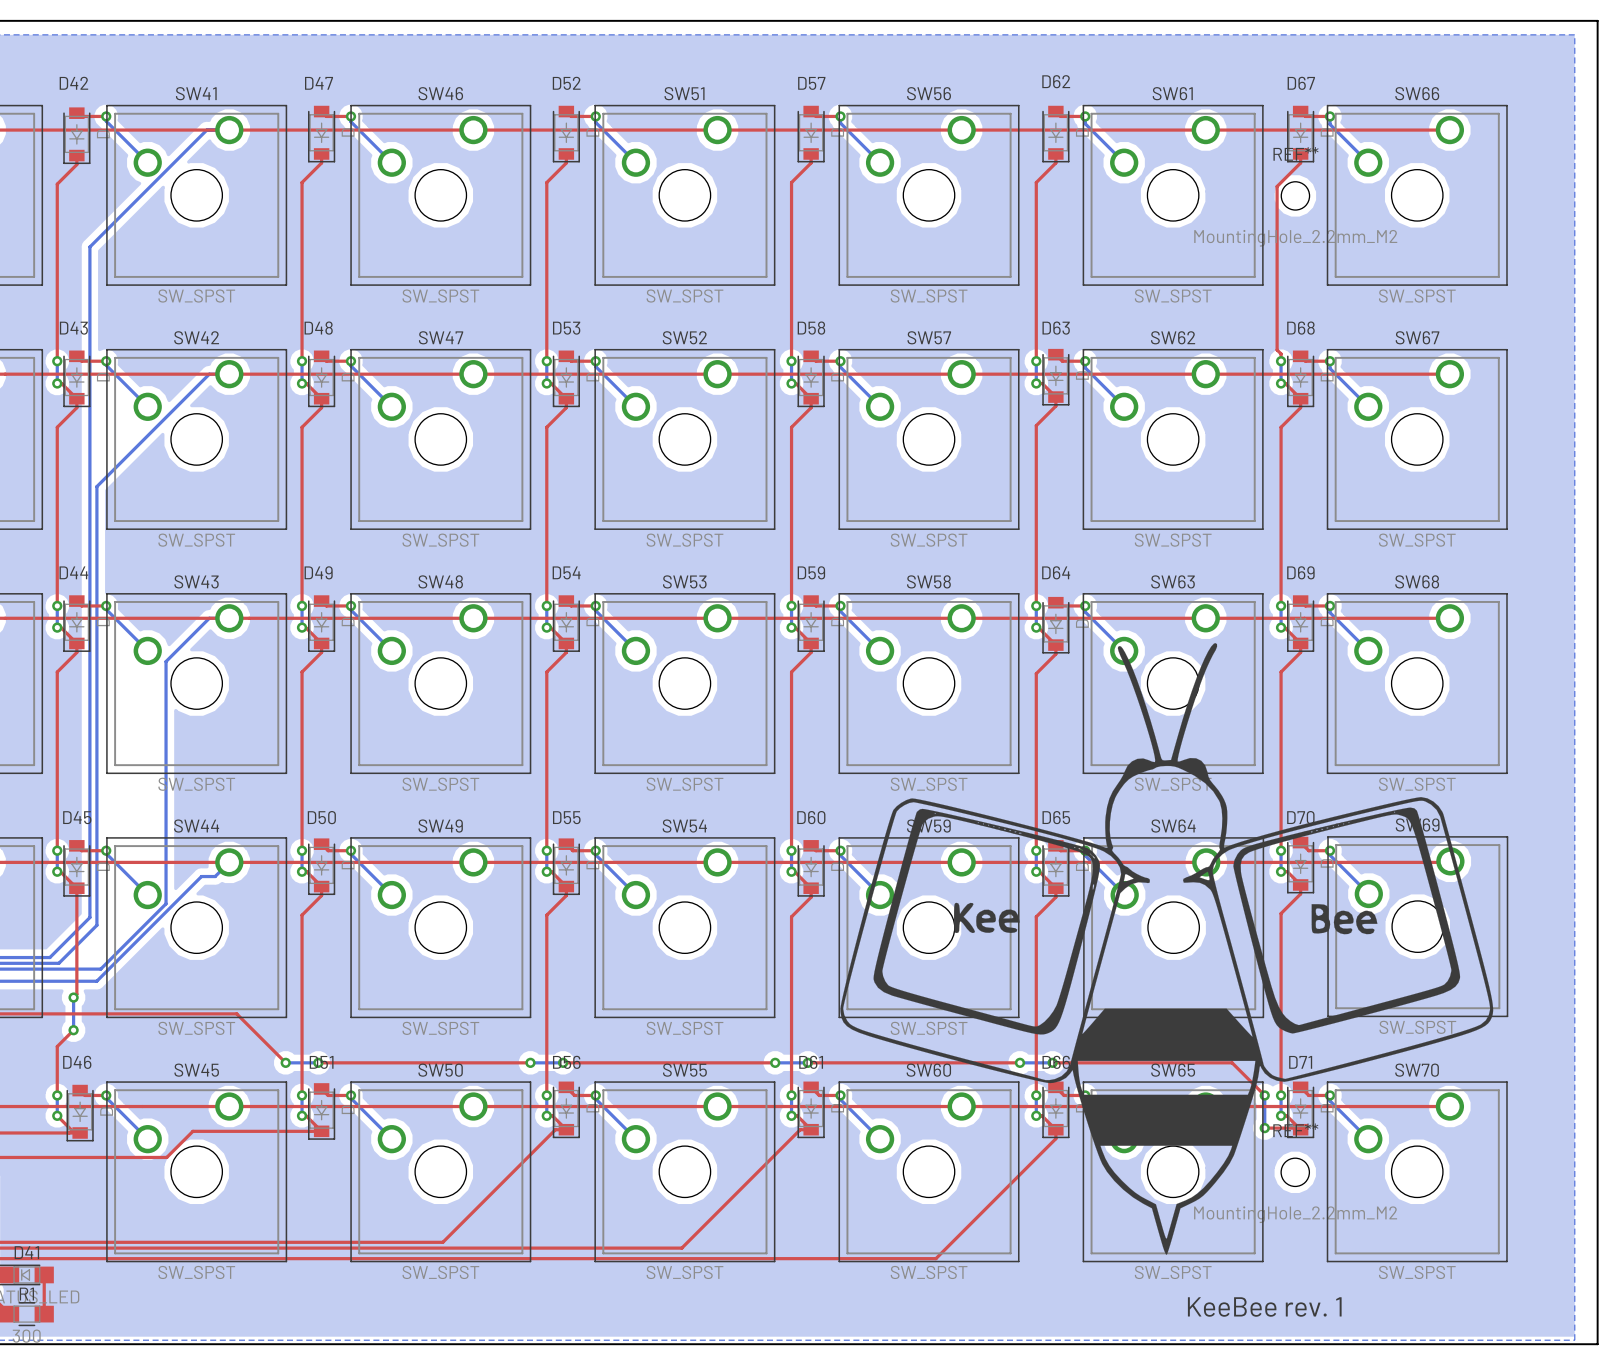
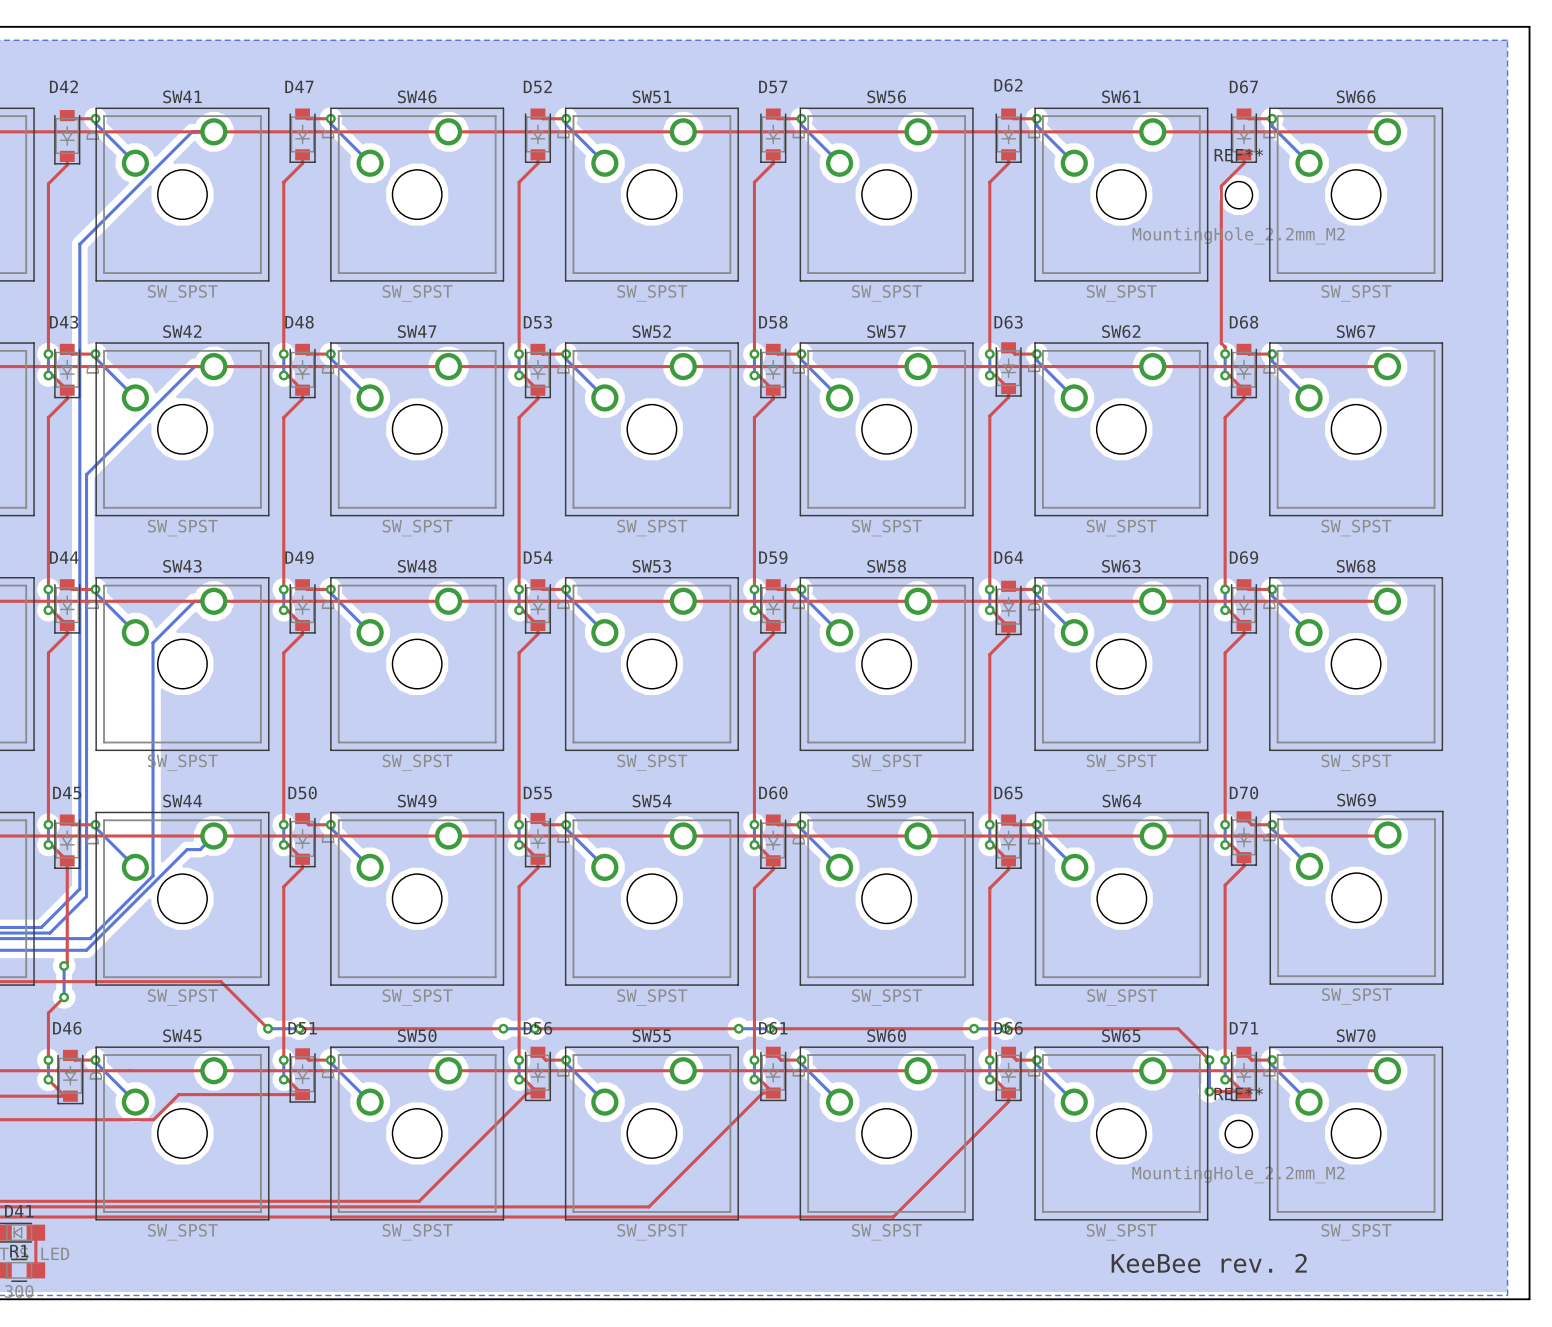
drawing: [840, 643, 1494, 1255] -> none
text: KeeBee rev. 1 (1264, 1306) -> KeeBee rev. 2 (1209, 1263)

